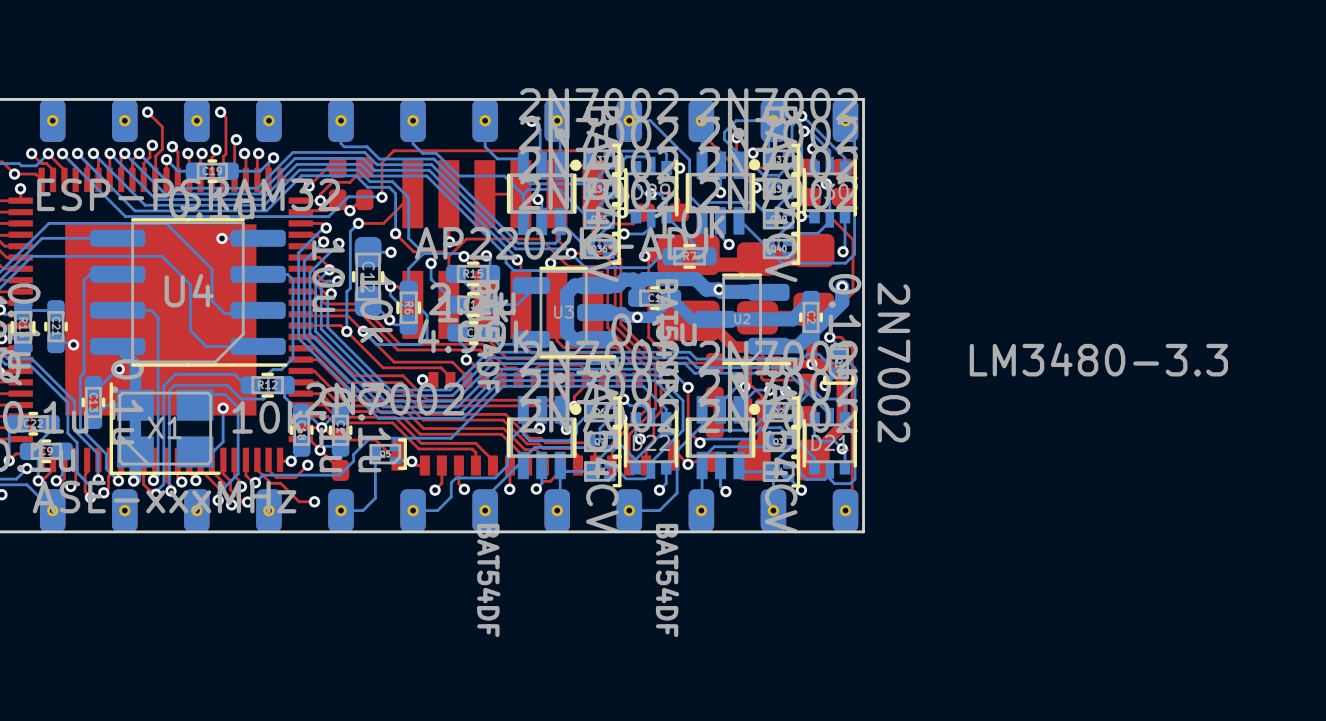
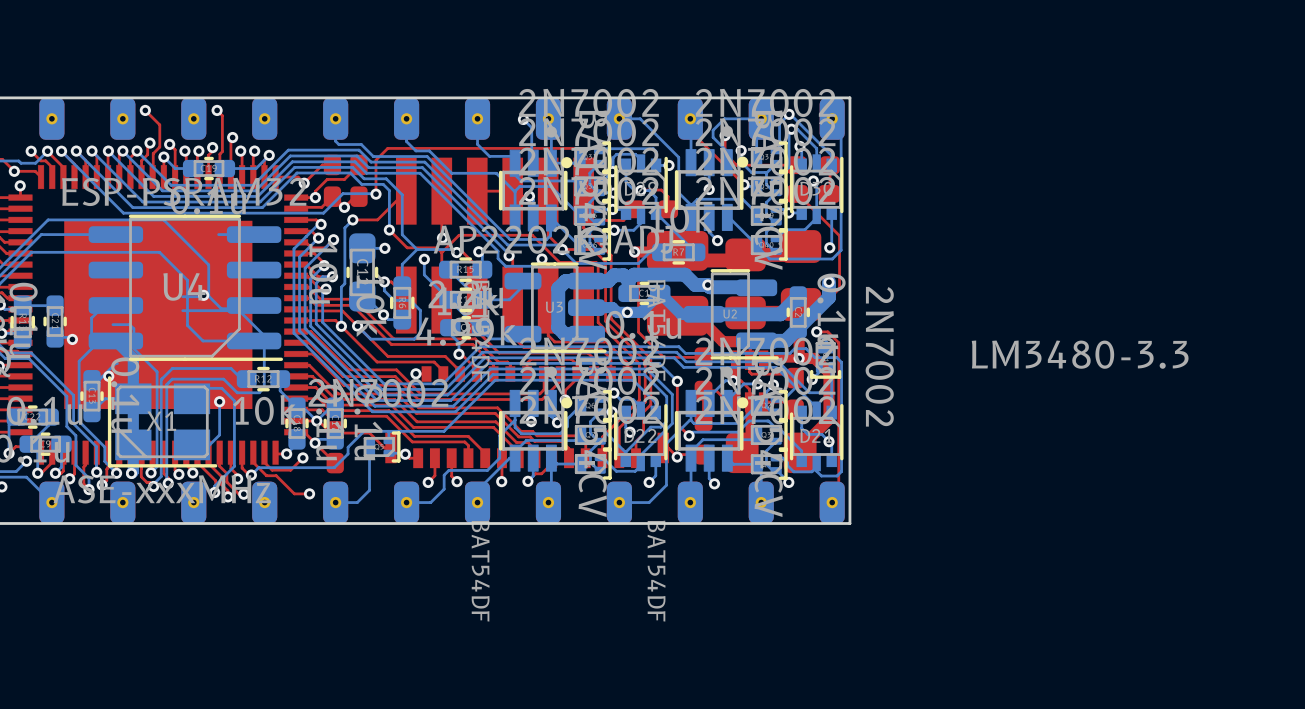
via: (221, 238) -> none
bottom track: (117, 274) (90, 274) (84, 280) (84, 373) (80, 376) -> (112, 310) (98, 310) (91, 318) (91, 348) (79, 361) (79, 370)
bottom track: (261, 274) (287, 274) (292, 279) (292, 358) (281, 369) (272, 369) (268, 373) -> (182, 310) (239, 310) (264, 335) (264, 367)
bottom track: none -> (203, 295) (182, 296)
via: none -> (203, 295)
bottom track: (117, 310) (151, 310) (158, 317) (158, 475) -> (112, 324) (129, 324) (133, 328) (133, 348) (157, 371) (155, 468)
via position: (119, 369) -> (108, 376)

